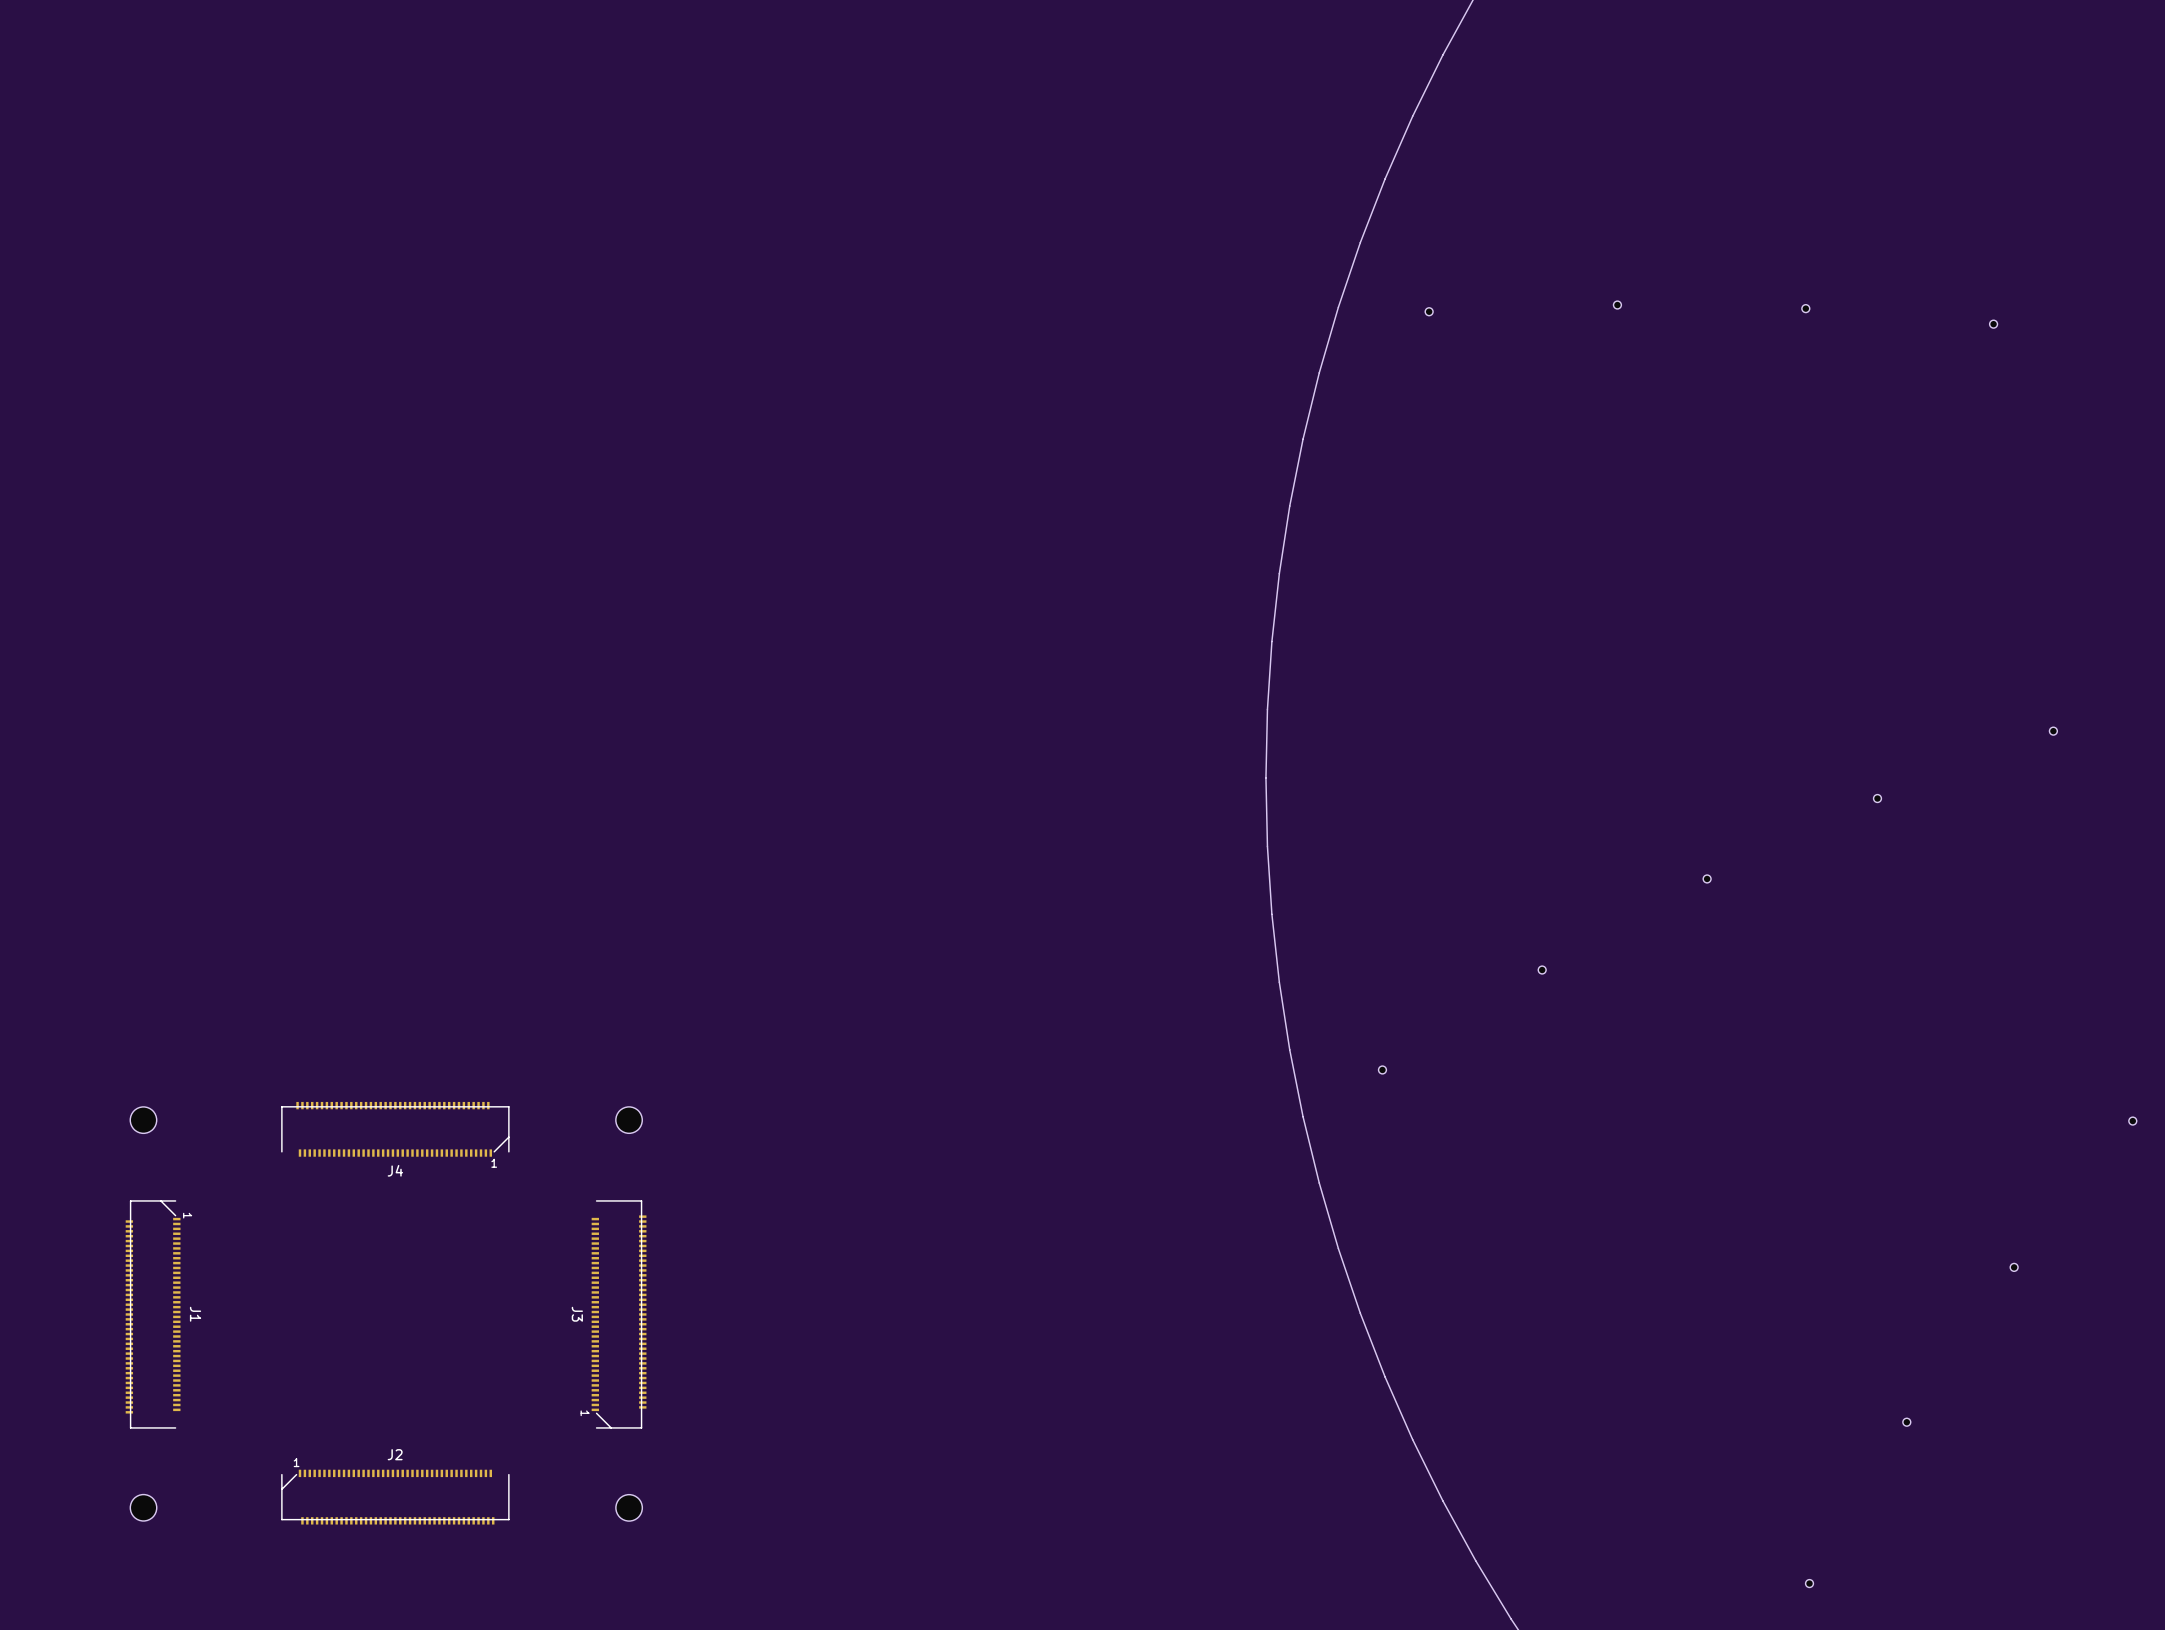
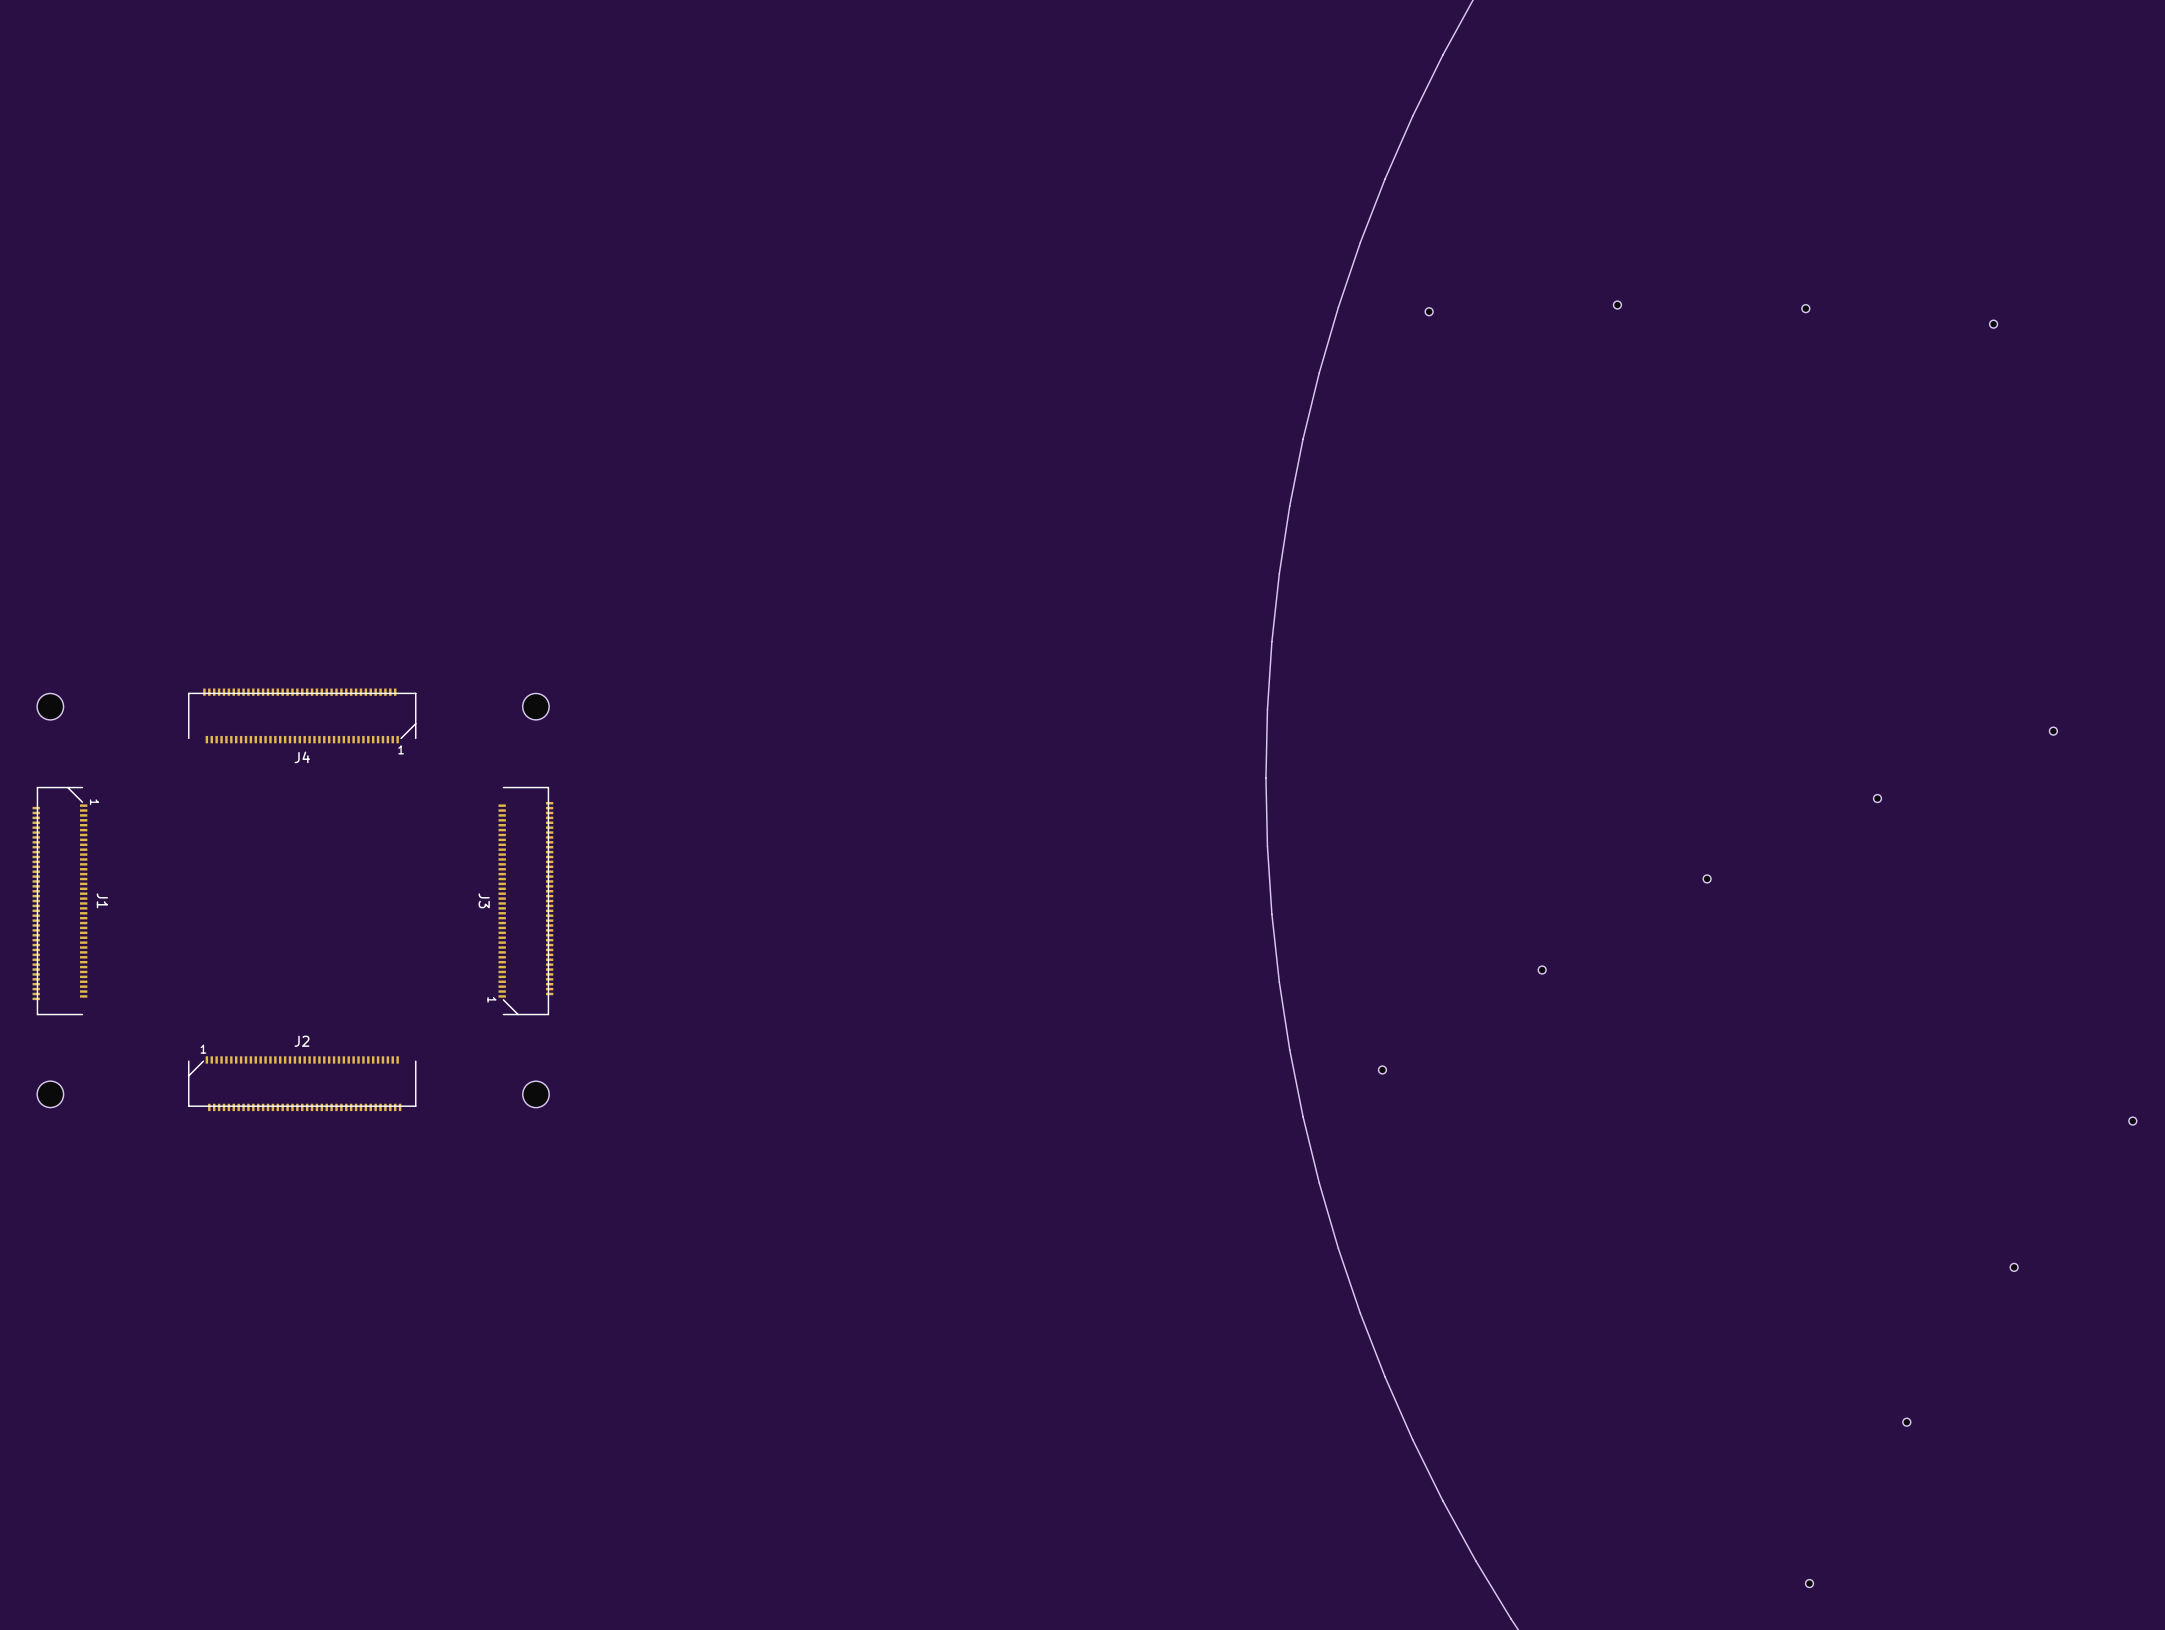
part: none -> (50, 706)
part: none -> (535, 706)
part position: (143, 1120) -> (50, 1094)
part position: (629, 1120) -> (535, 1094)
J4 position: (395, 1129) -> (302, 715)
J1 position: (153, 1314) -> (59, 901)
J3 position: (619, 1314) -> (525, 901)
J2 position: (395, 1497) -> (302, 1083)
part: (143, 1507) -> none
part: (629, 1507) -> none

